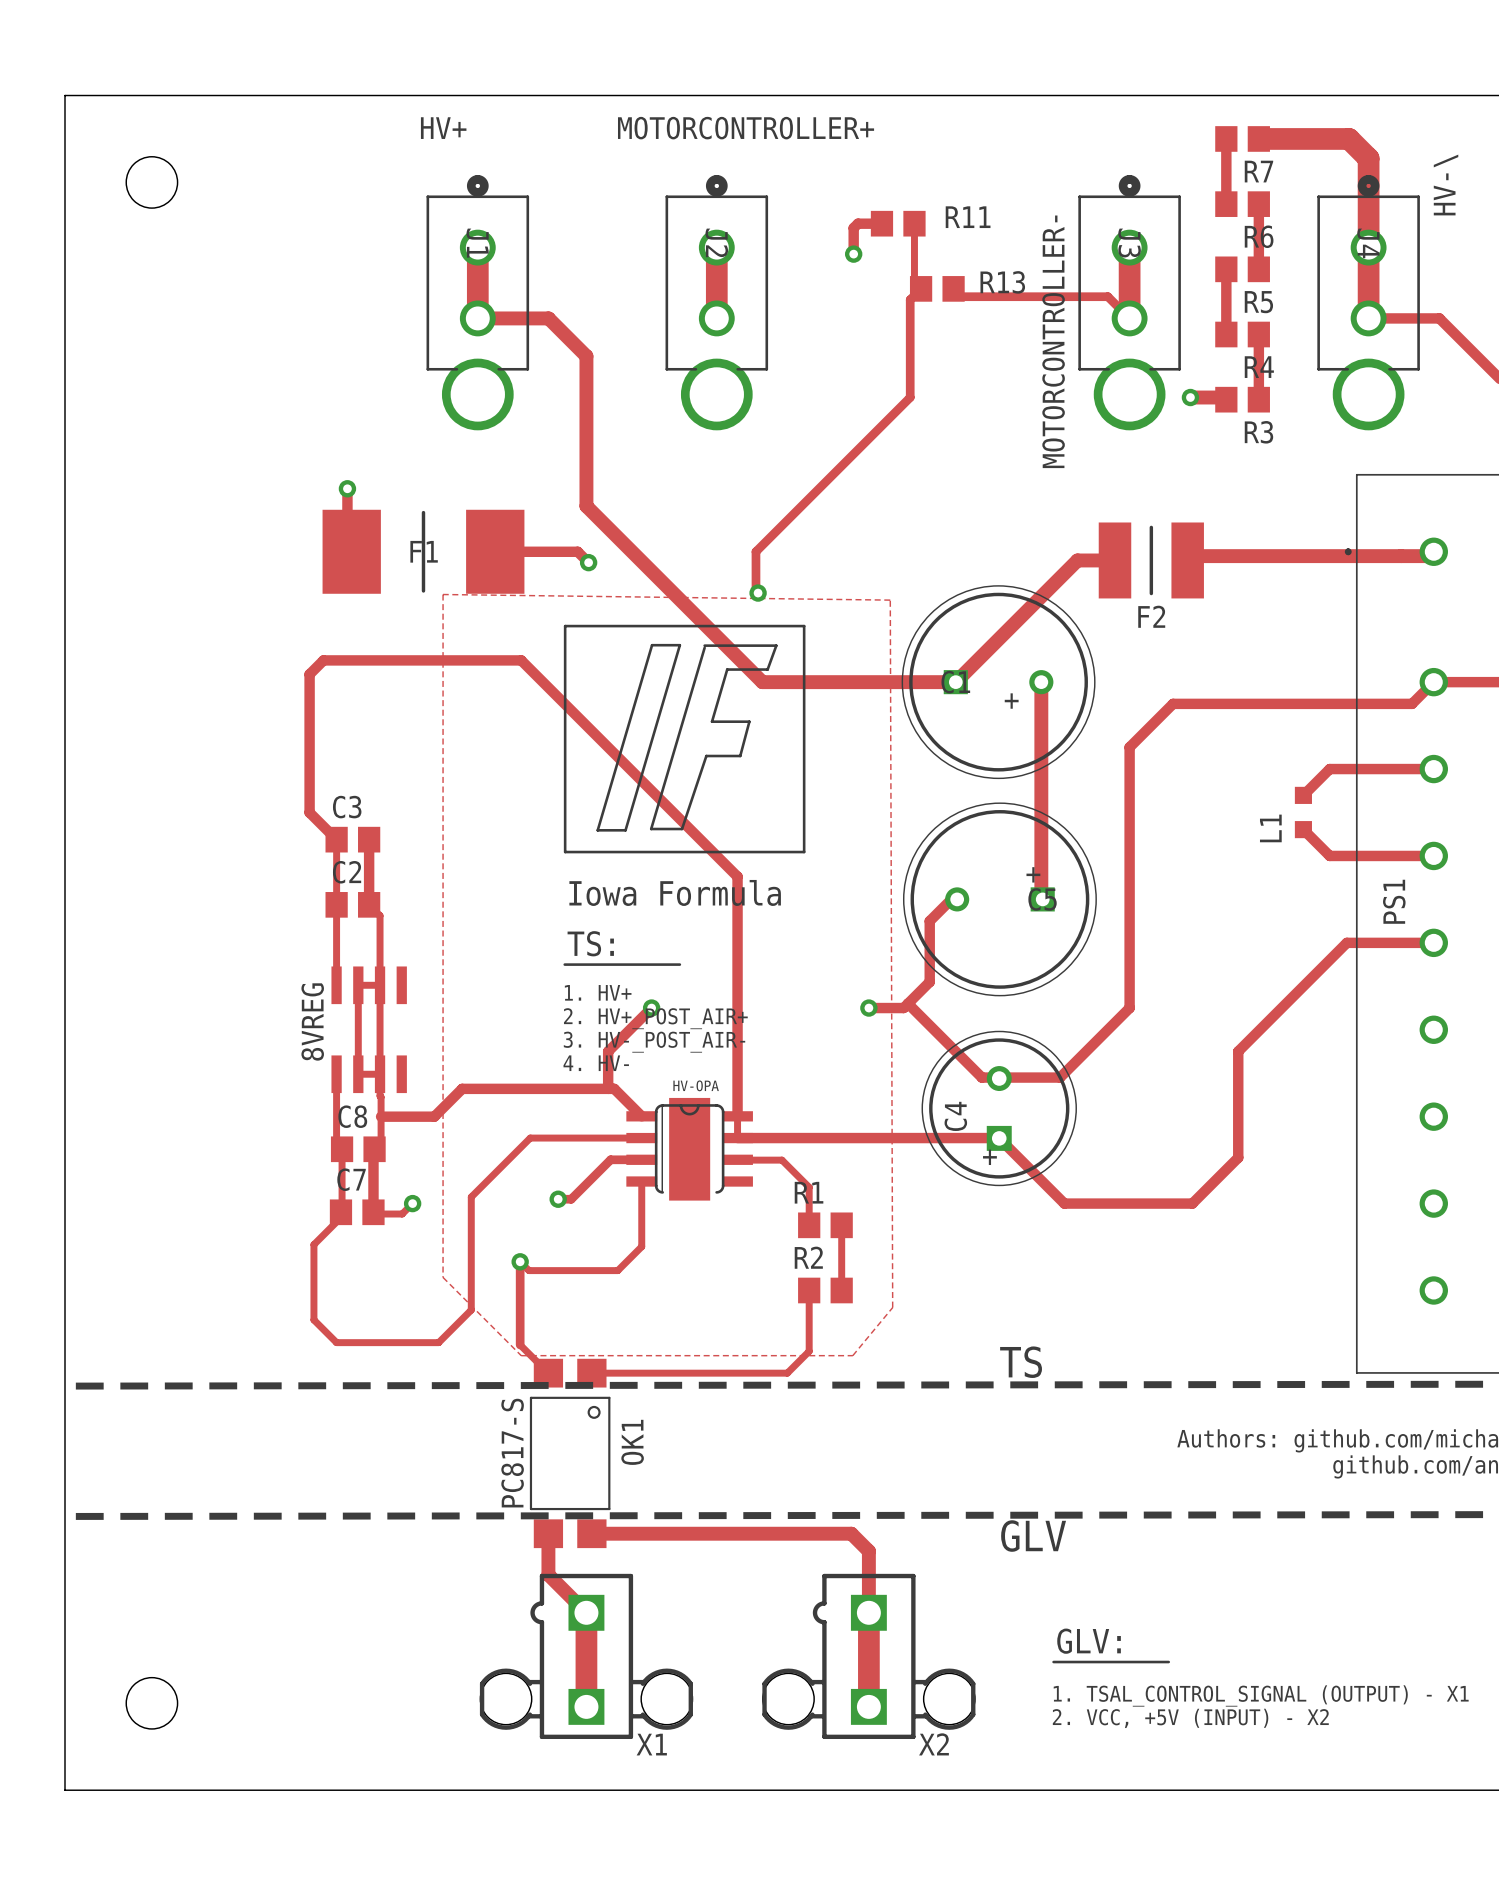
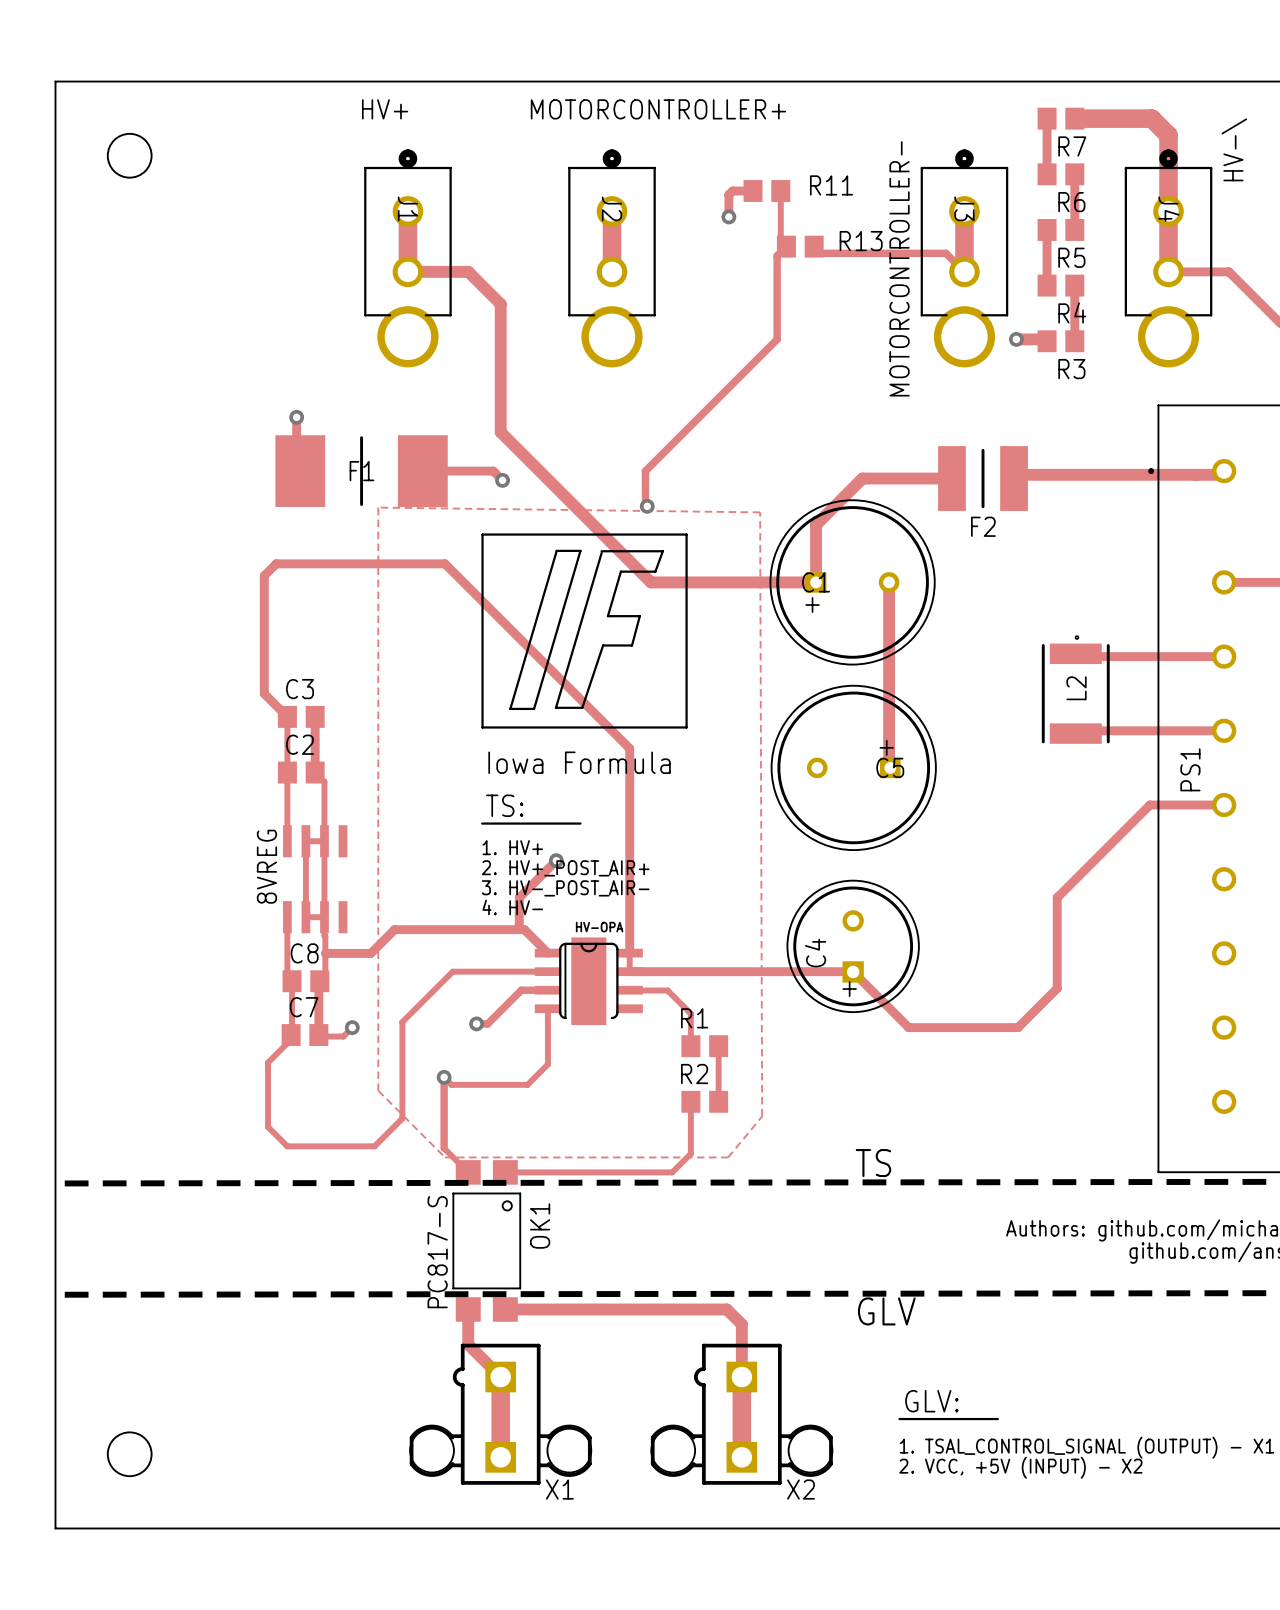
track: (1077, 560) (955, 682) -> (919, 478) (862, 478) (816, 524) (816, 582)
track: (1433, 682) (1412, 703) (1173, 703) (1129, 747) (1129, 1008) (1060, 1077) (981, 1077) (908, 1003) -> none
text position: + (1011, 701) -> + (812, 605)
track: (1329, 769) (1303, 795) -> (1135, 656) (1078, 656) (1075, 653)
L2: none -> (1075, 689)
L1: (1303, 812) -> none
track: (1303, 829) (1329, 855) -> (1075, 733) (1078, 730) (1135, 730)
track: (957, 899) (951, 899) (929, 921) (929, 981) (903, 1008) (868, 1008) -> none
via: (868, 1008) -> none

